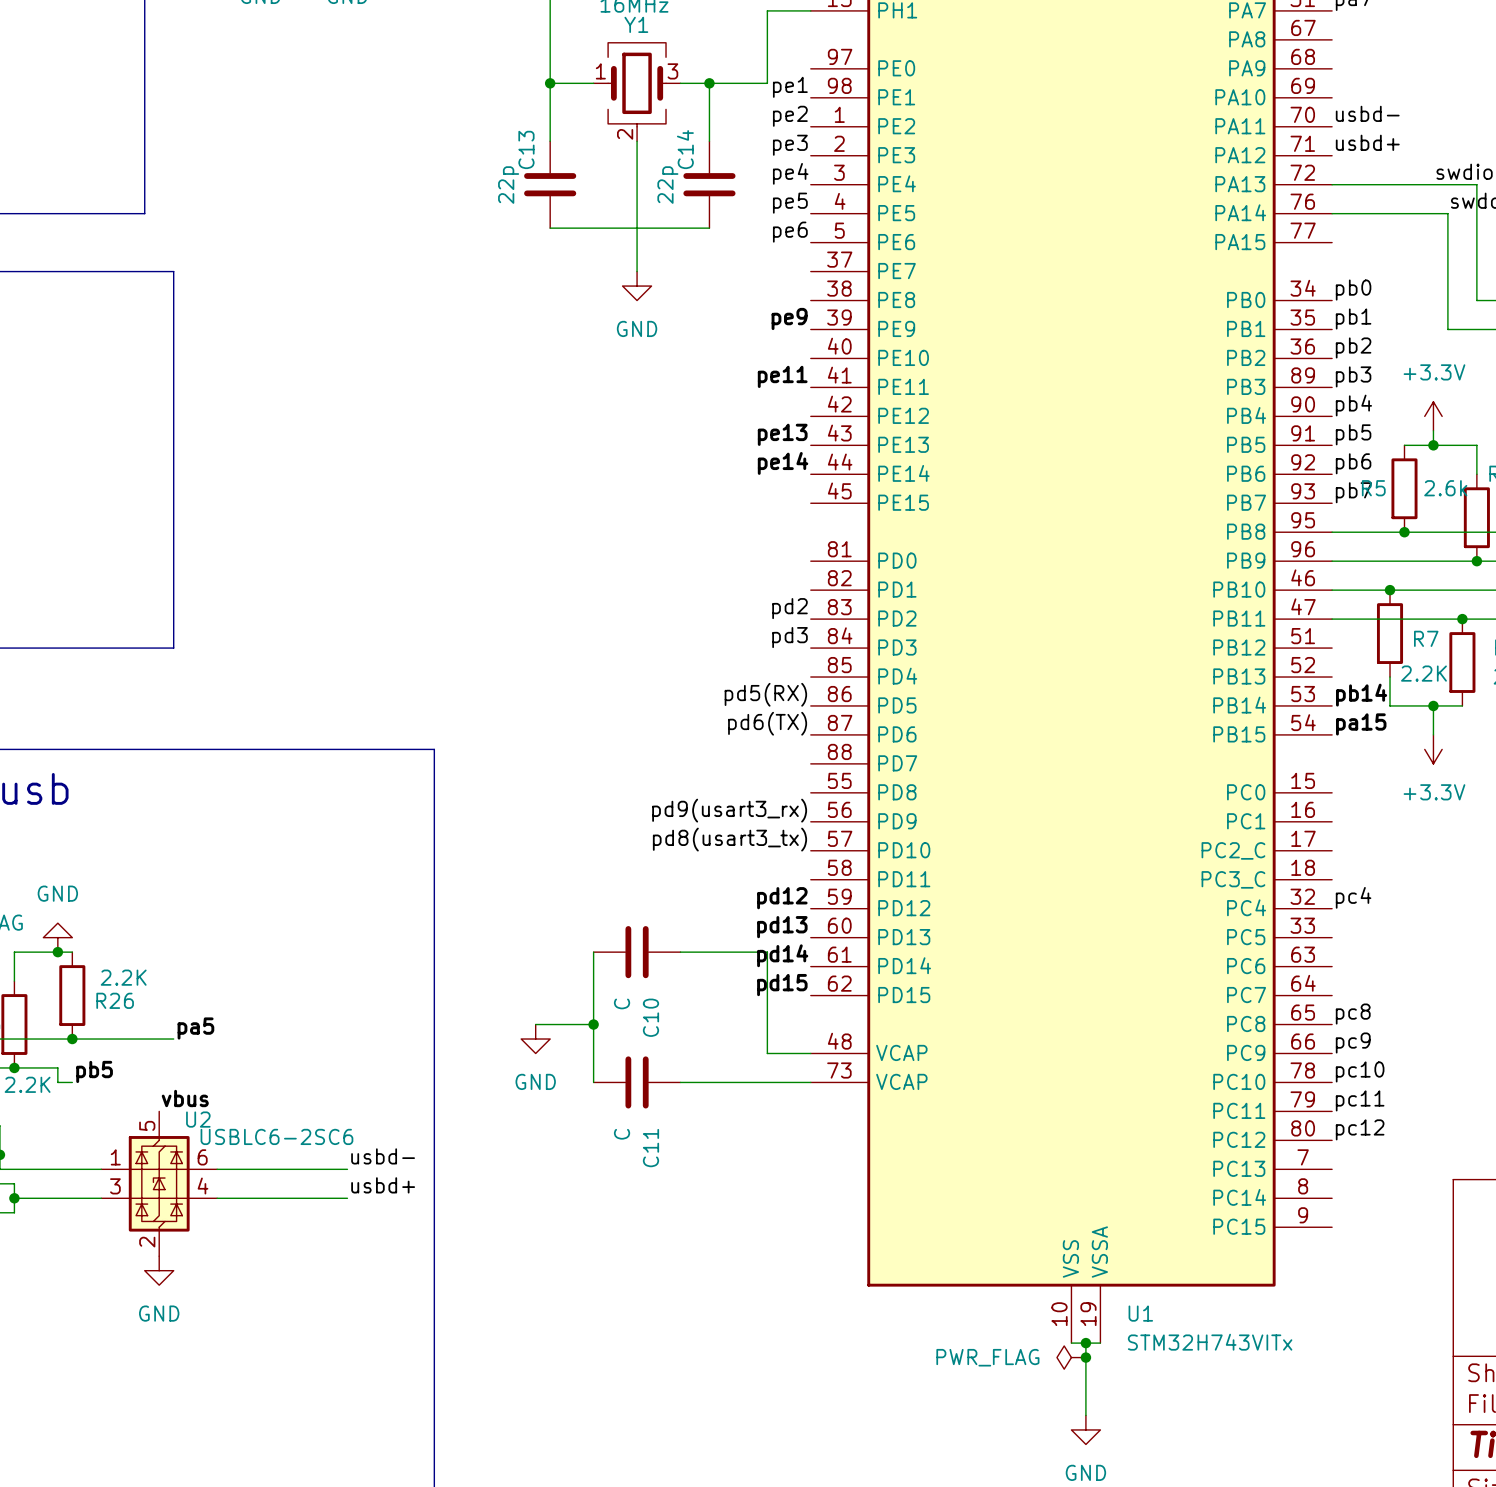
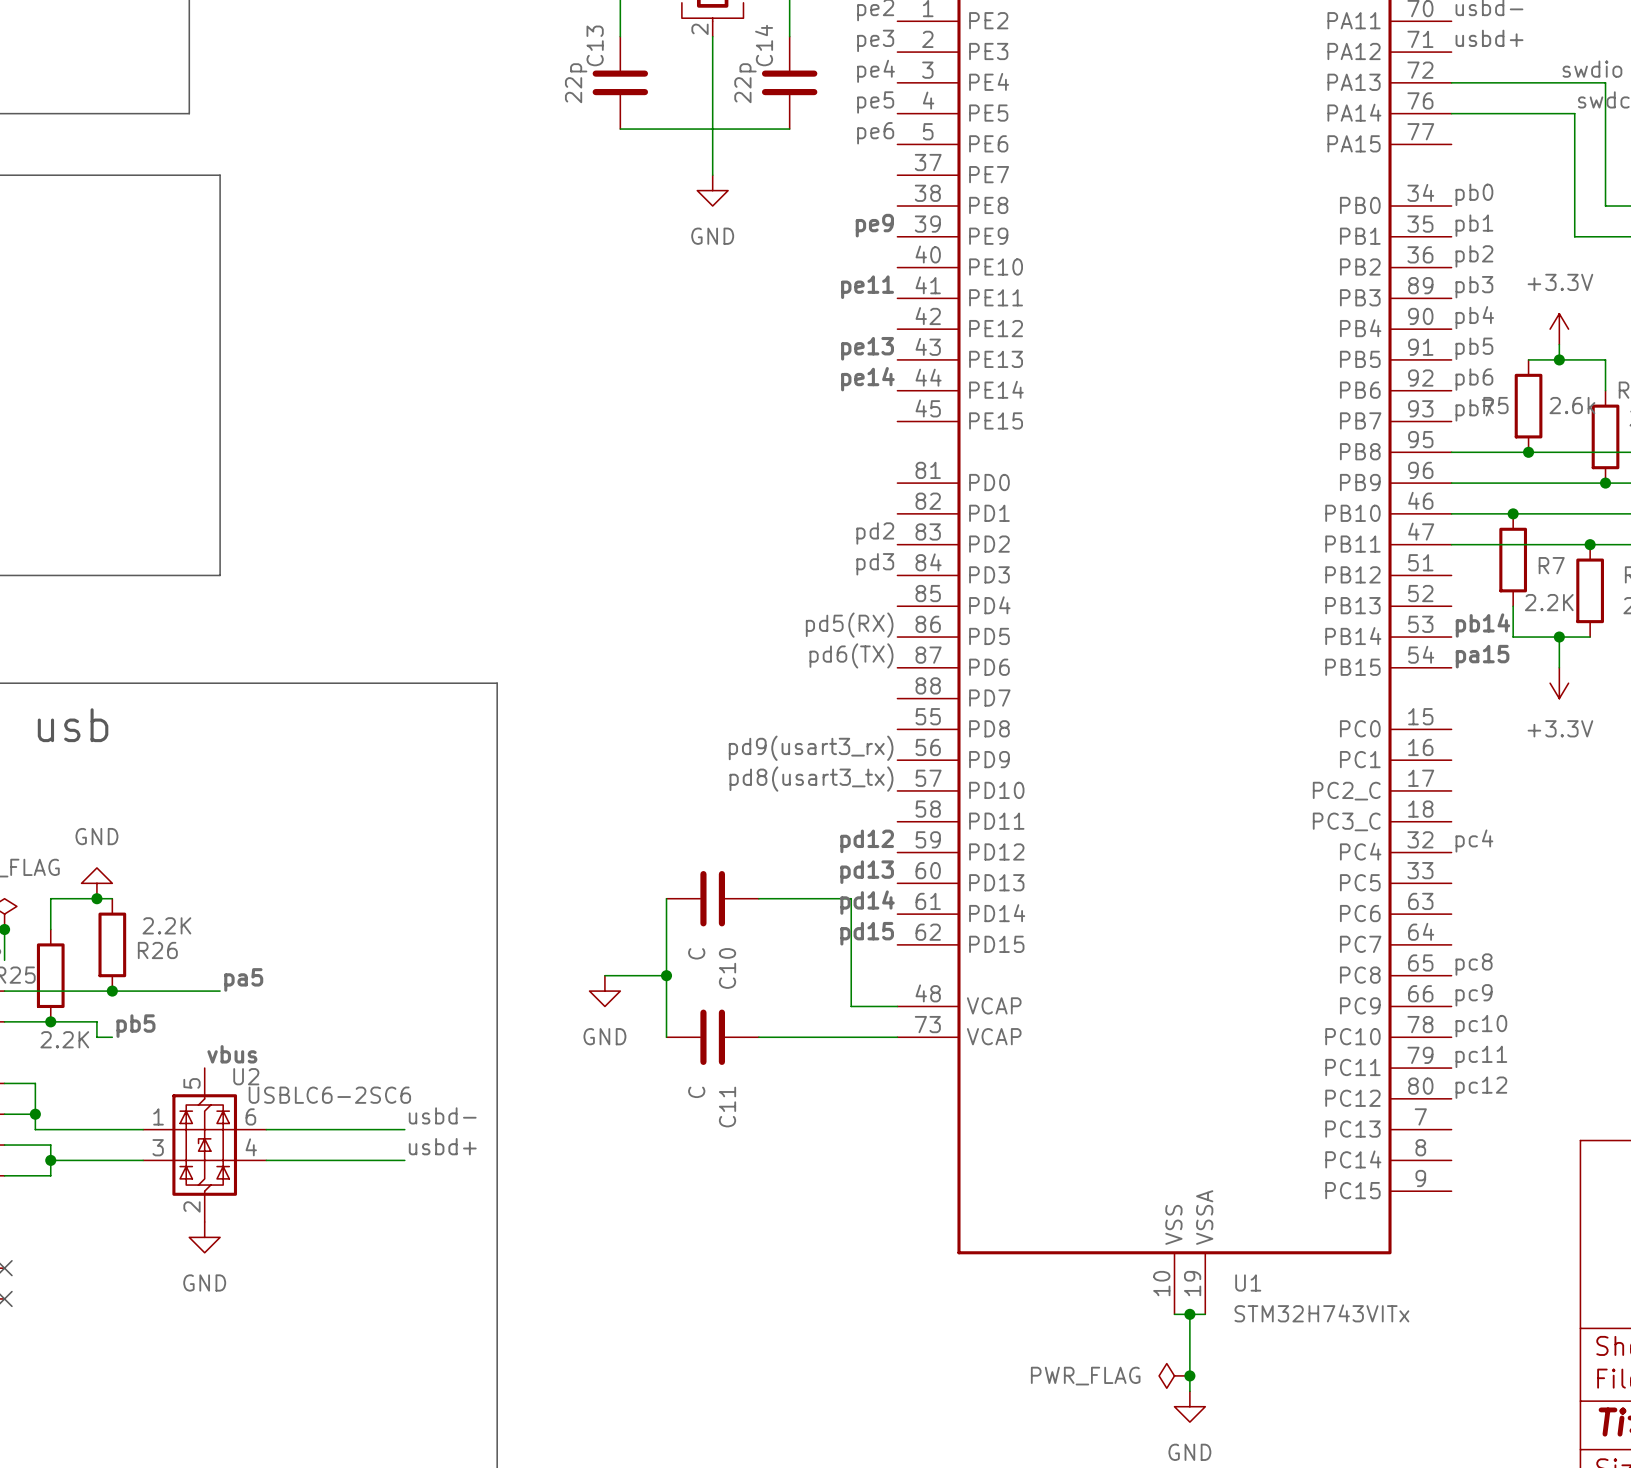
power symbol position: PWR_FLAG (1071, 1357) -> PWR_FLAG (1174, 1375)
junction position: (1085, 1357) -> (1189, 1375)

